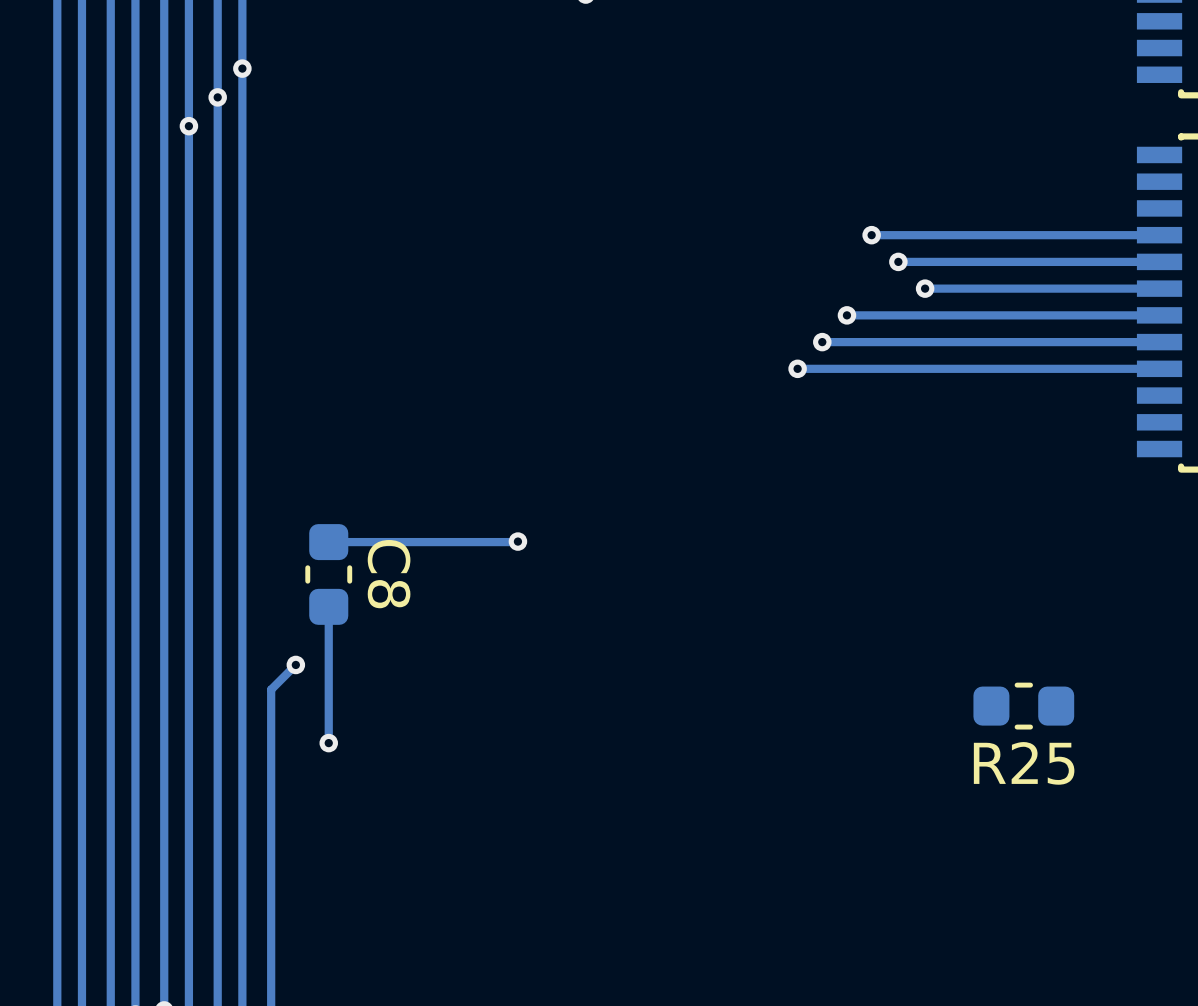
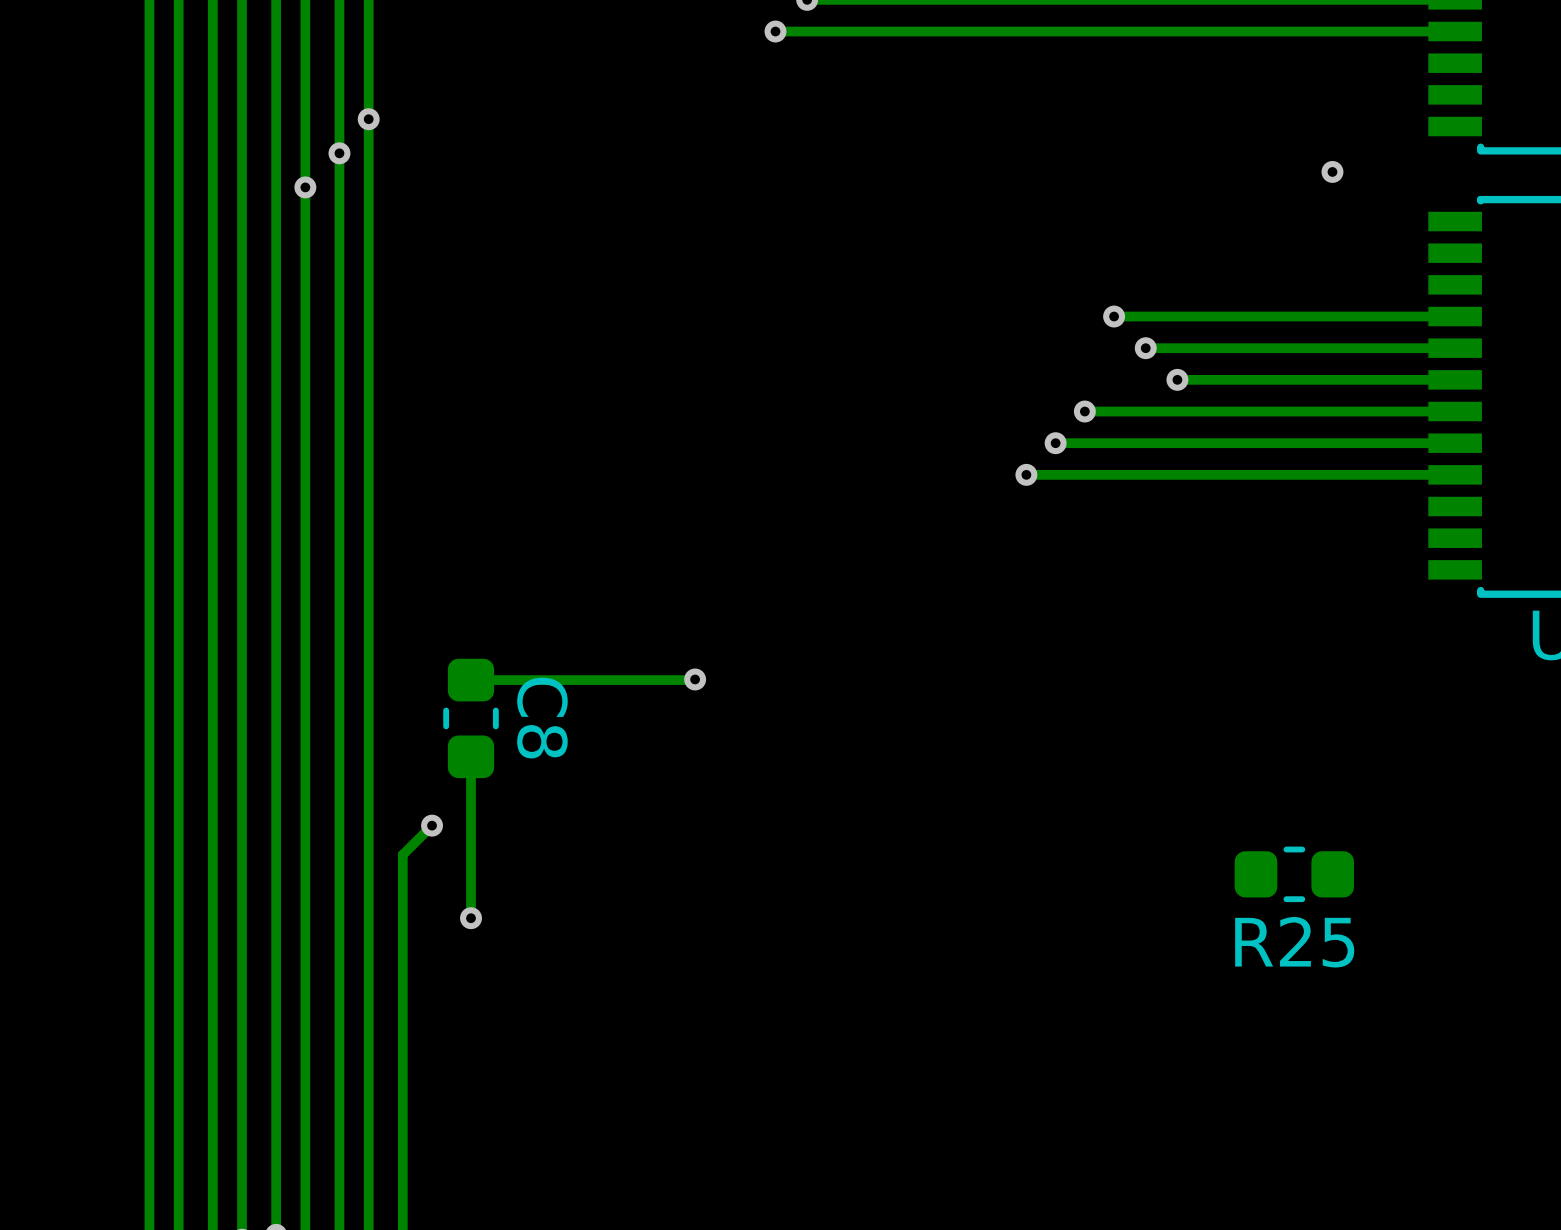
via: none -> (1332, 171)

